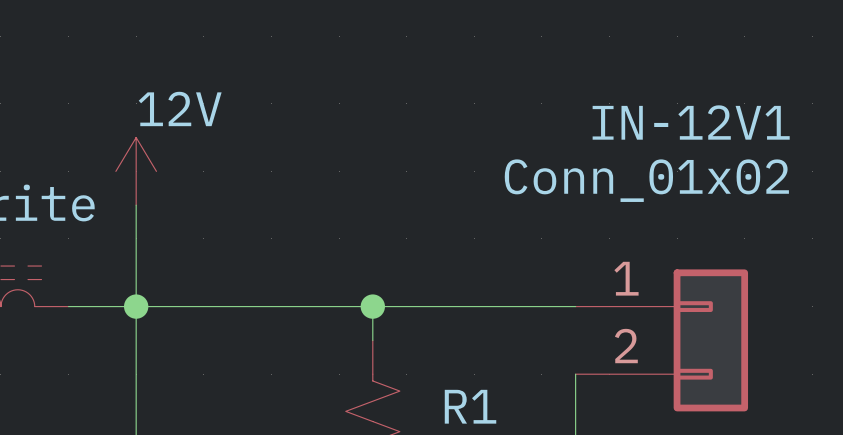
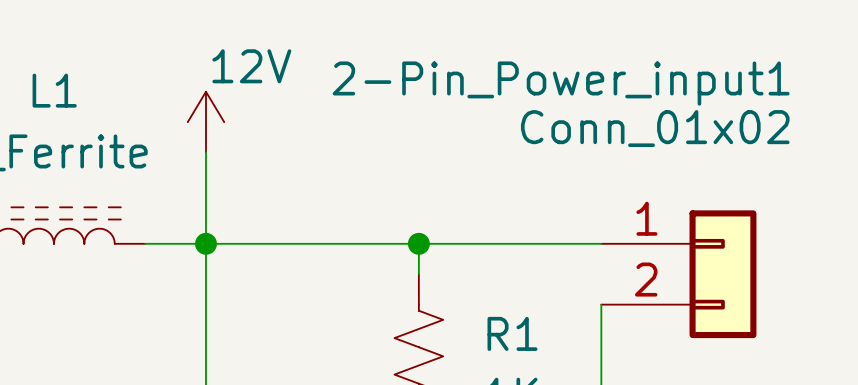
IN-12V1 name: IN-12V1 (691, 122) -> 2-Pin_Power_input1 (561, 83)

